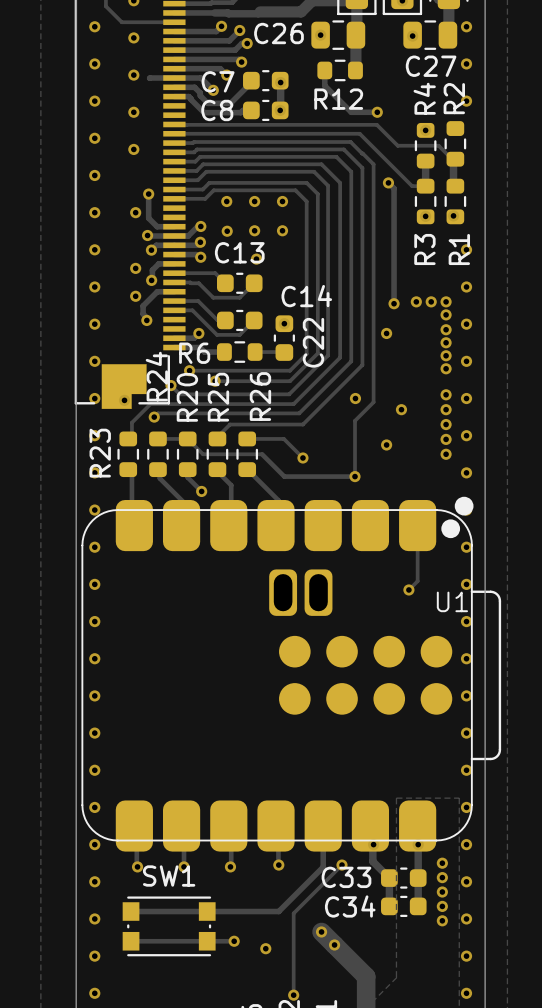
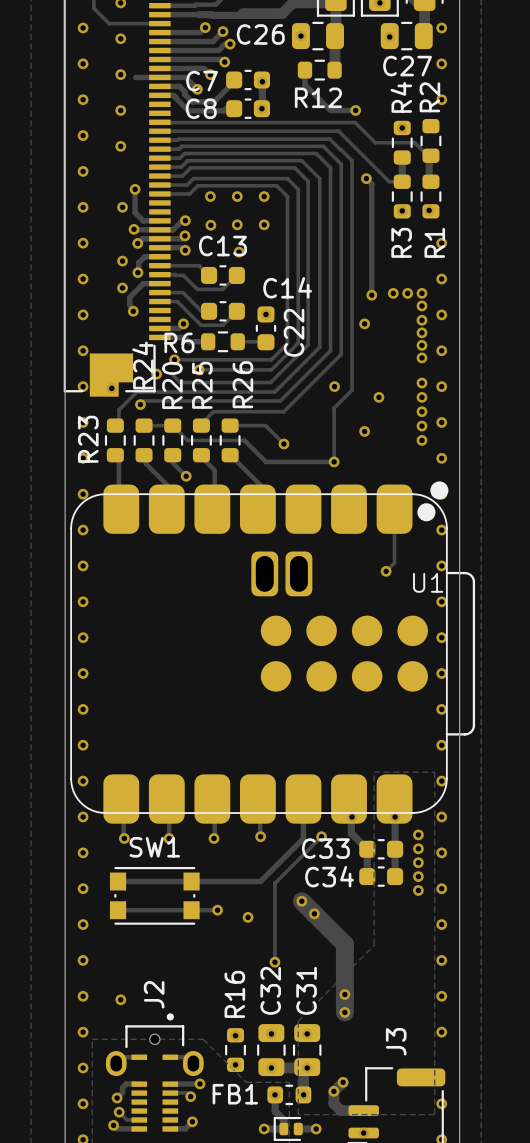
track: (170, 385) (179, 394) (289, 394) -> (171, 374) (180, 382) (270, 382)

